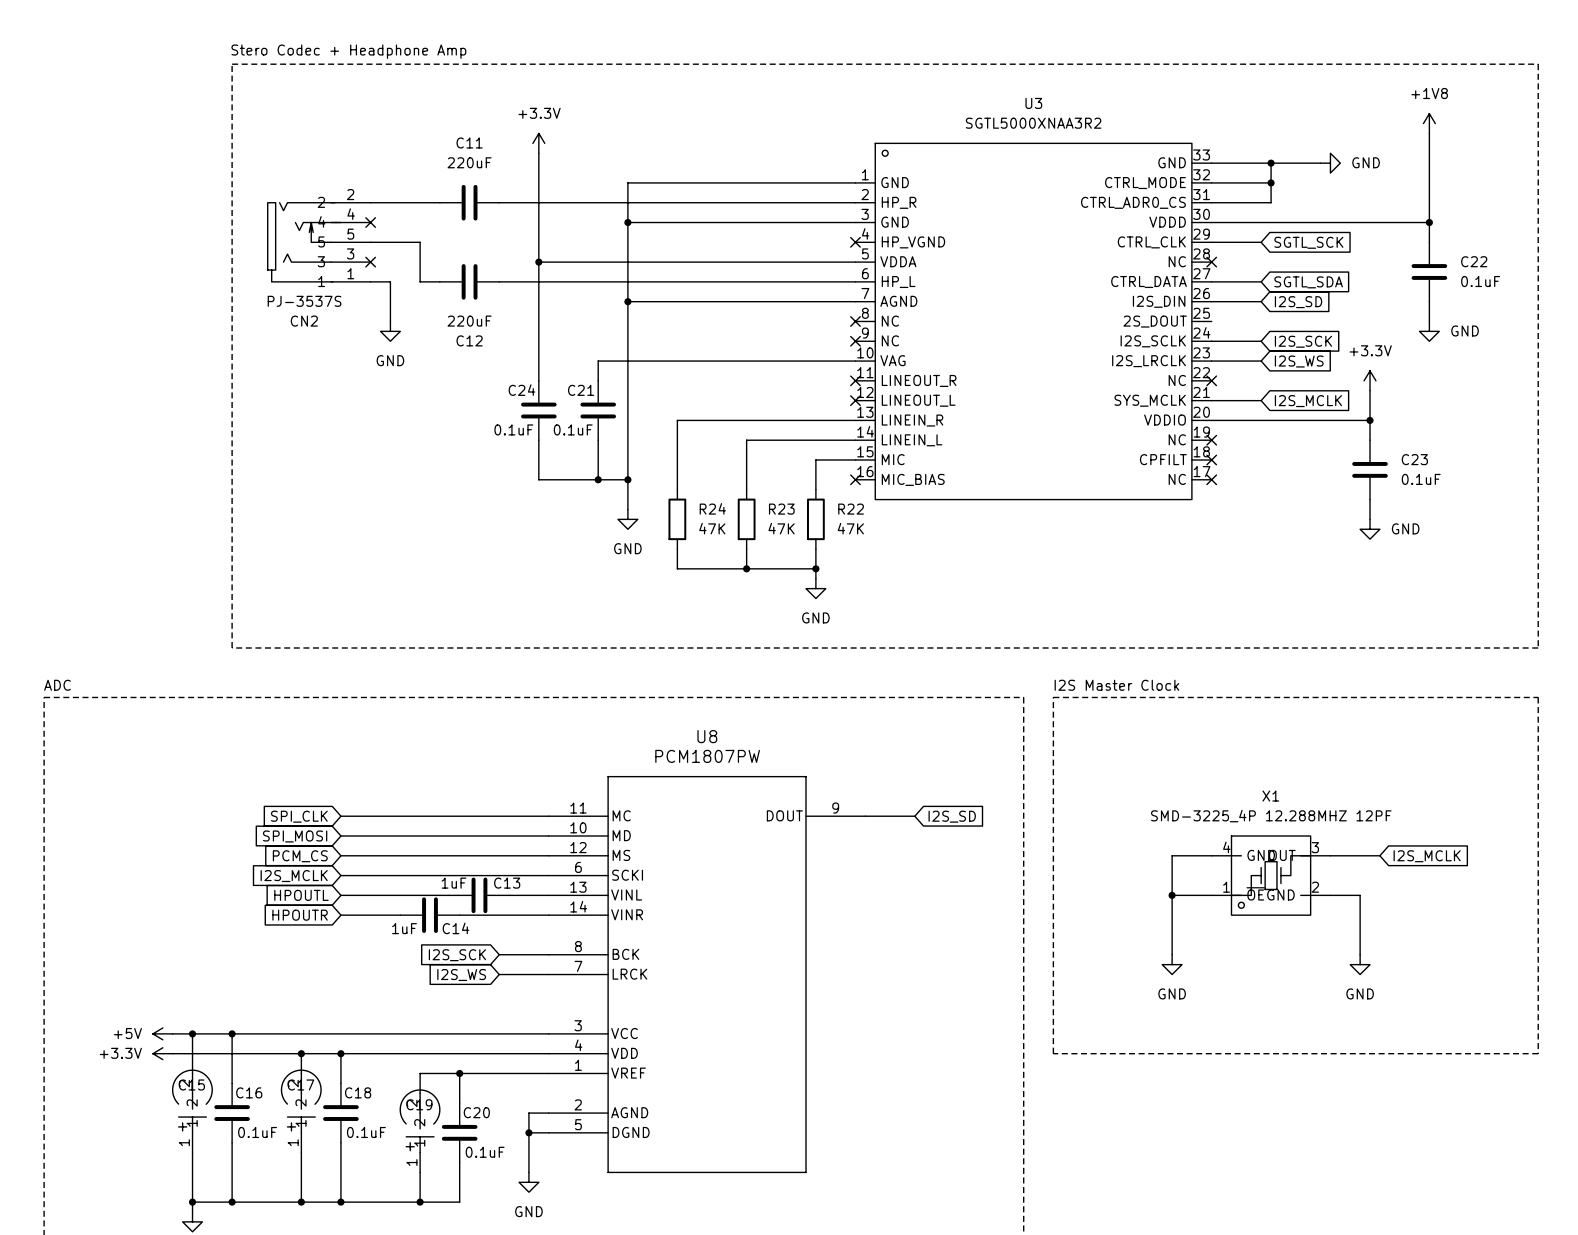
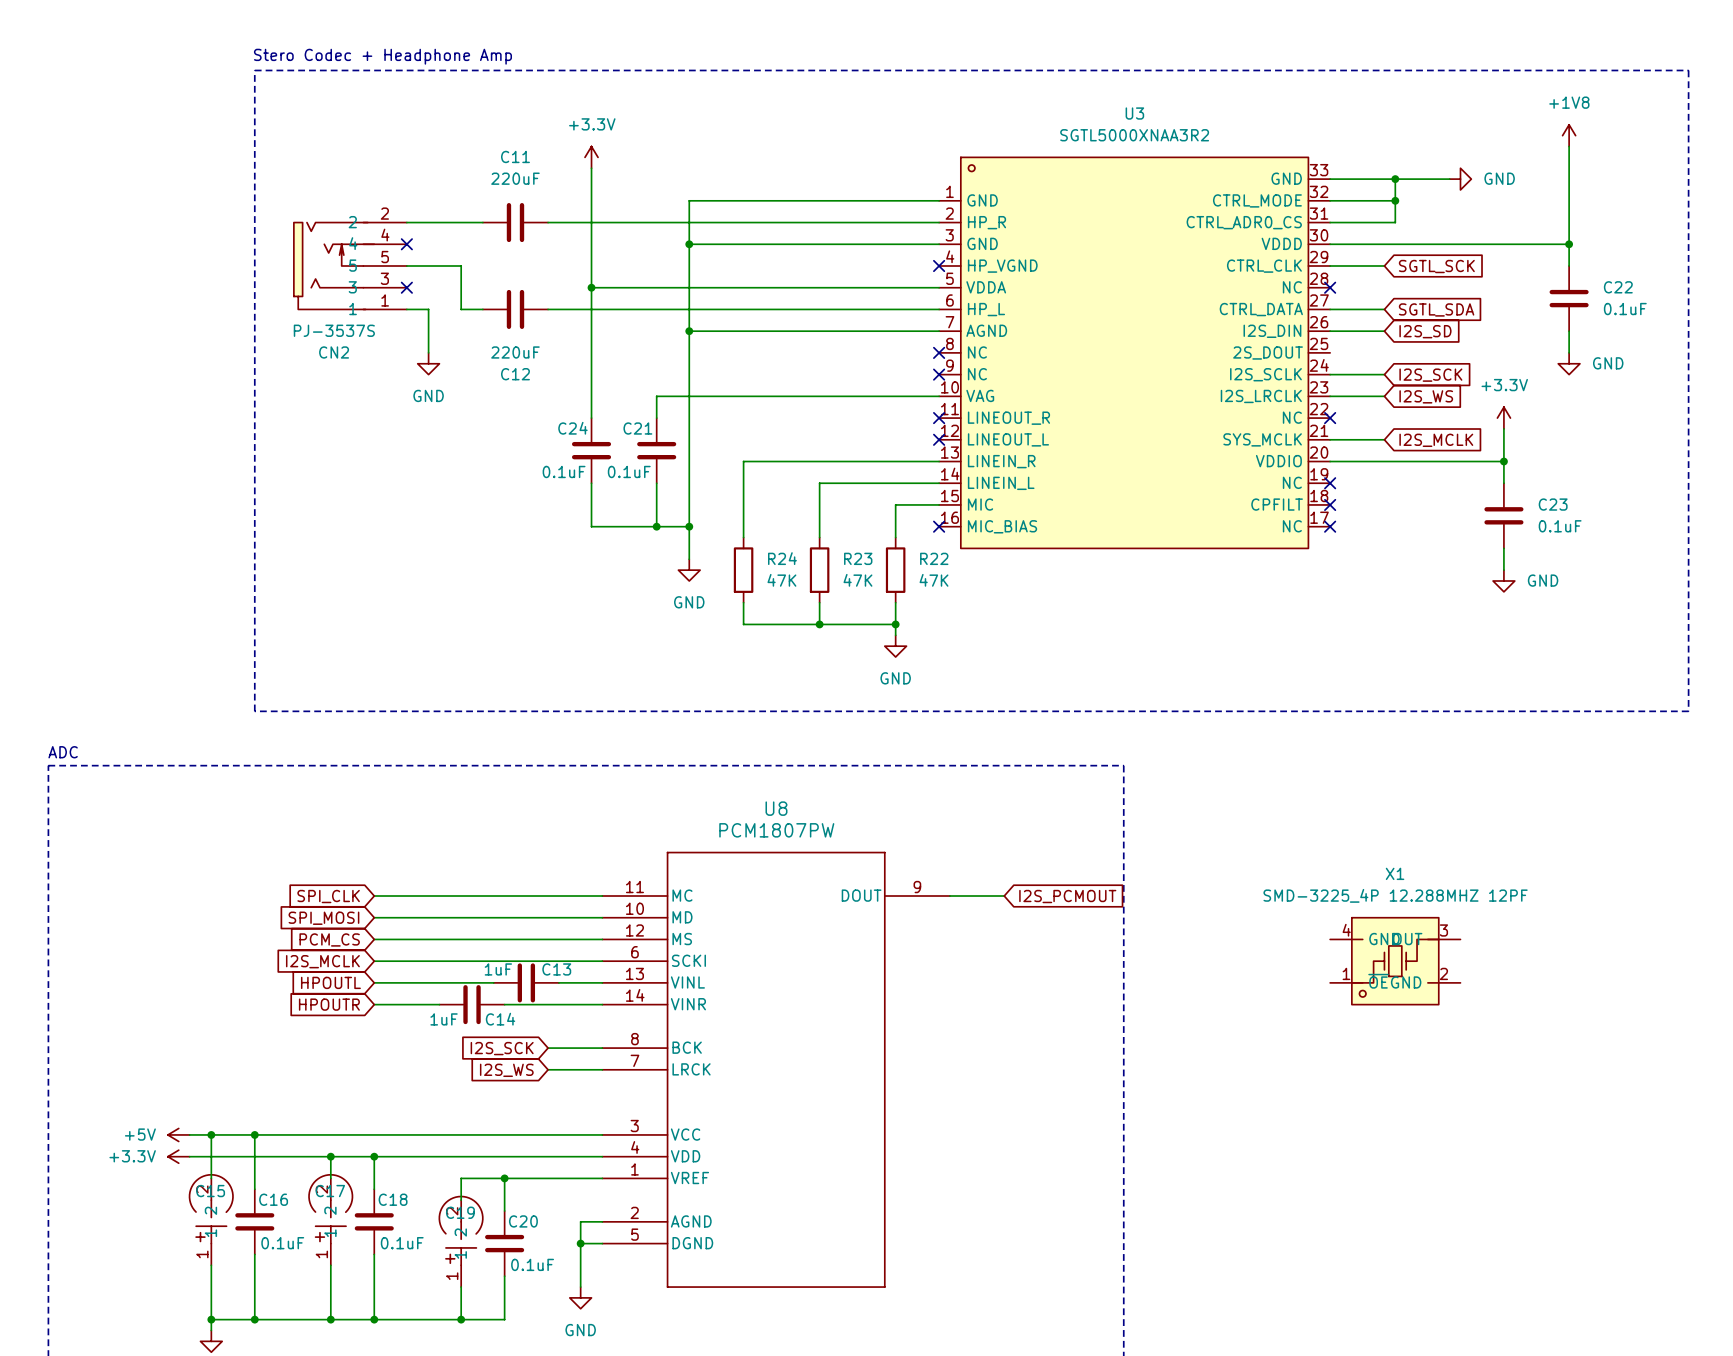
text: I2S Master Clock (1116, 685) -> none
line: (1053, 697) (1538, 697) (1538, 1053) (1053, 1053) (1053, 697) -> none
global label: I2S_SD (952, 816) -> I2S_PCMOUT (1067, 896)
wire: (1211, 855) (1172, 855) (1172, 954) -> none
wire: (1330, 855) (1379, 855) -> none
global label: I2S_MCLK (1427, 856) -> none
wire: (1172, 895) (1211, 895) -> none
junction: (1172, 895) -> none
wire: (1330, 895) (1360, 895) (1360, 954) -> none
power symbol: GND (1172, 964) -> none
power symbol: GND (1360, 964) -> none

